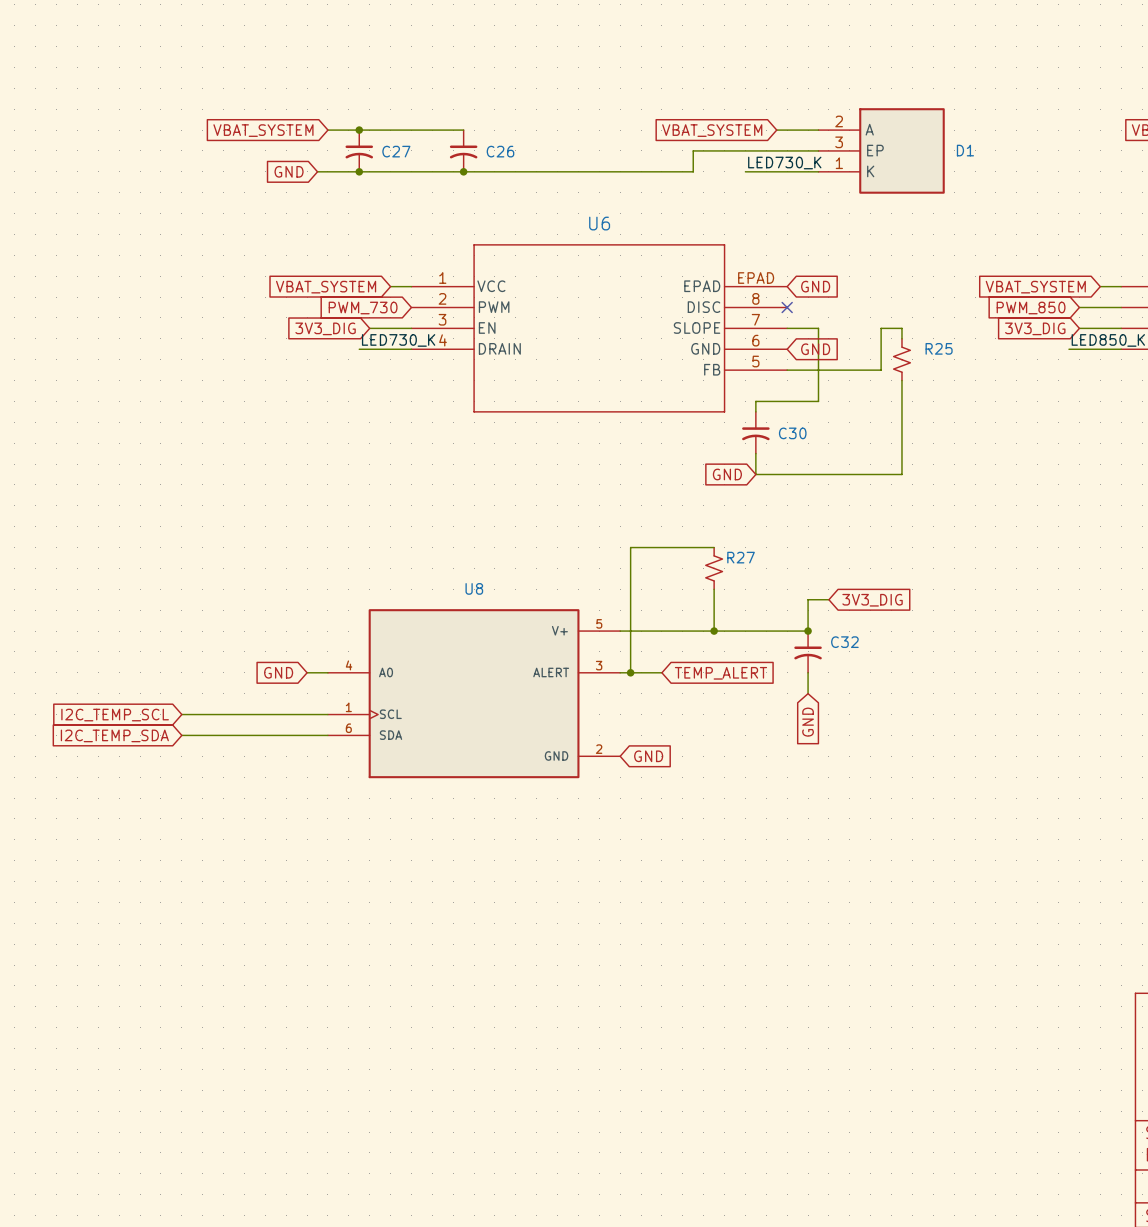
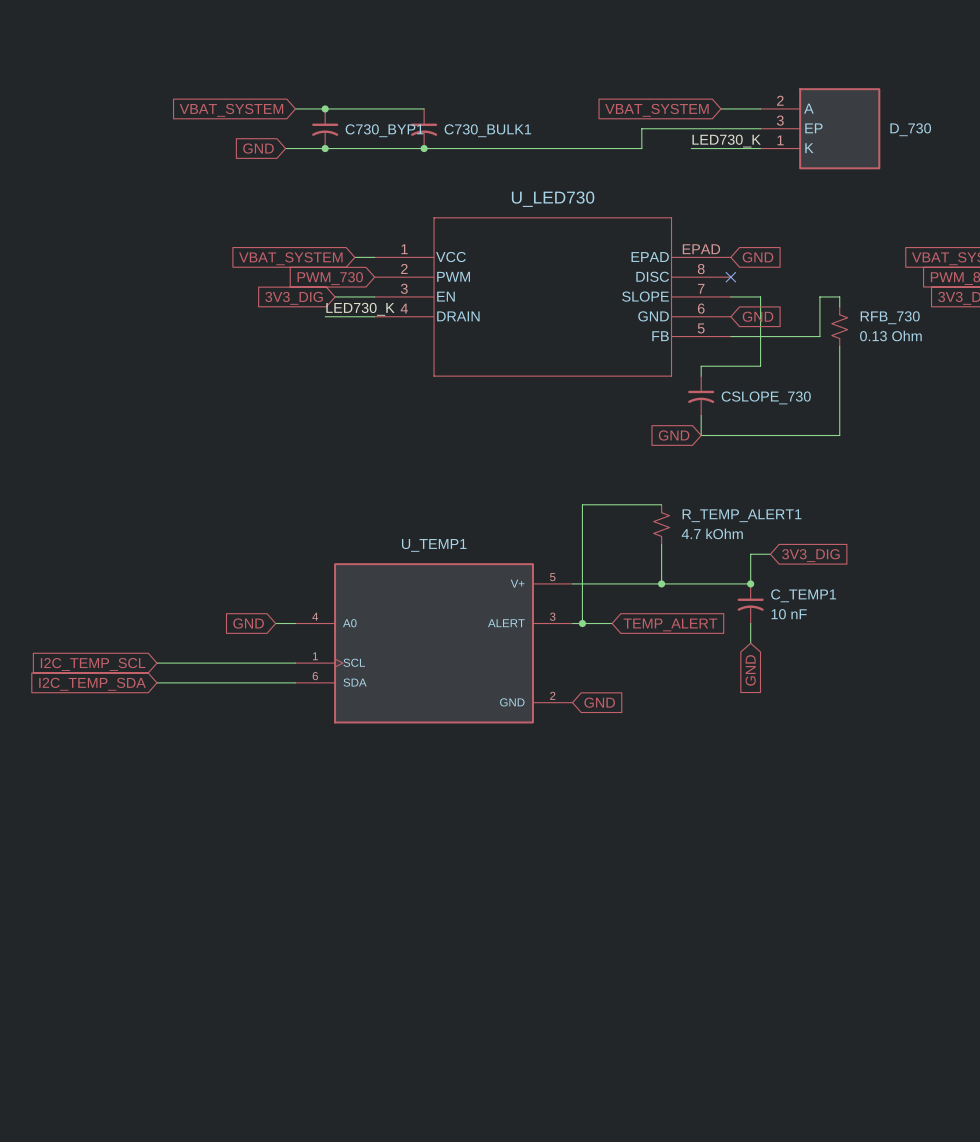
D1 name: D1 (965, 150) -> D_730 (910, 129)
C27 name: C27 (396, 151) -> C730_BYP1 (384, 130)
C26 name: C26 (500, 151) -> C730_BULK1 (487, 130)
U6 name: U6 (599, 223) -> U_LED730 (553, 199)
R25 name: R25 (939, 348) -> RFB_730 (890, 317)
R25 value: none -> 0.13 Ohm (890, 335)
C30 name: C30 (792, 433) -> CSLOPE_730 (766, 397)
R27 name: R27 (741, 557) -> R_TEMP_ALERT1 (741, 515)
R27 value: none -> 4.7 kOhm (712, 533)
U8 name: U8 (474, 588) -> U_TEMP1 (434, 545)
C32 name: C32 (844, 642) -> C_TEMP1 (803, 595)
C32 value: none -> 10 nF (789, 614)

